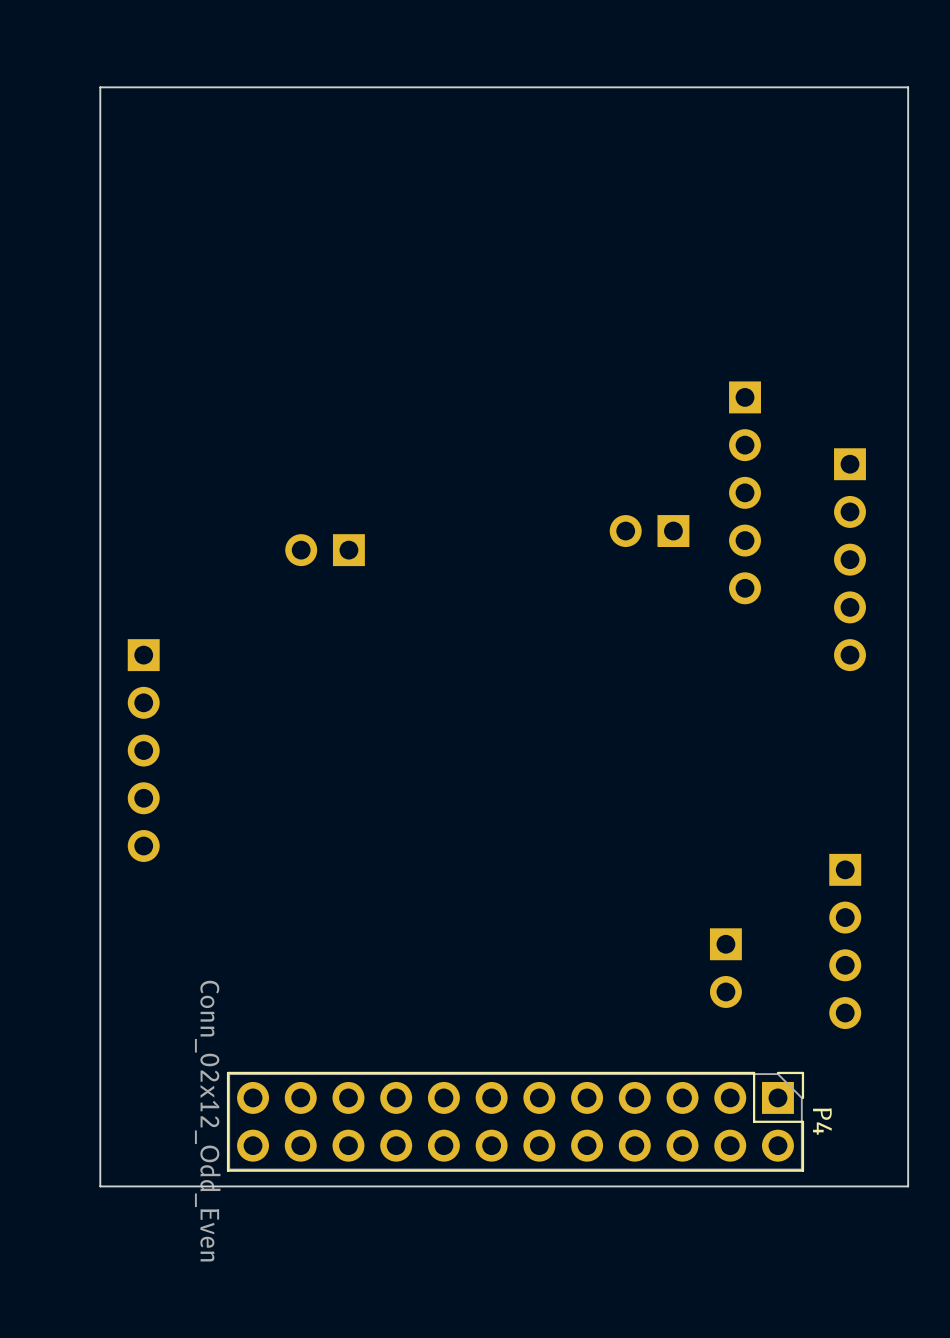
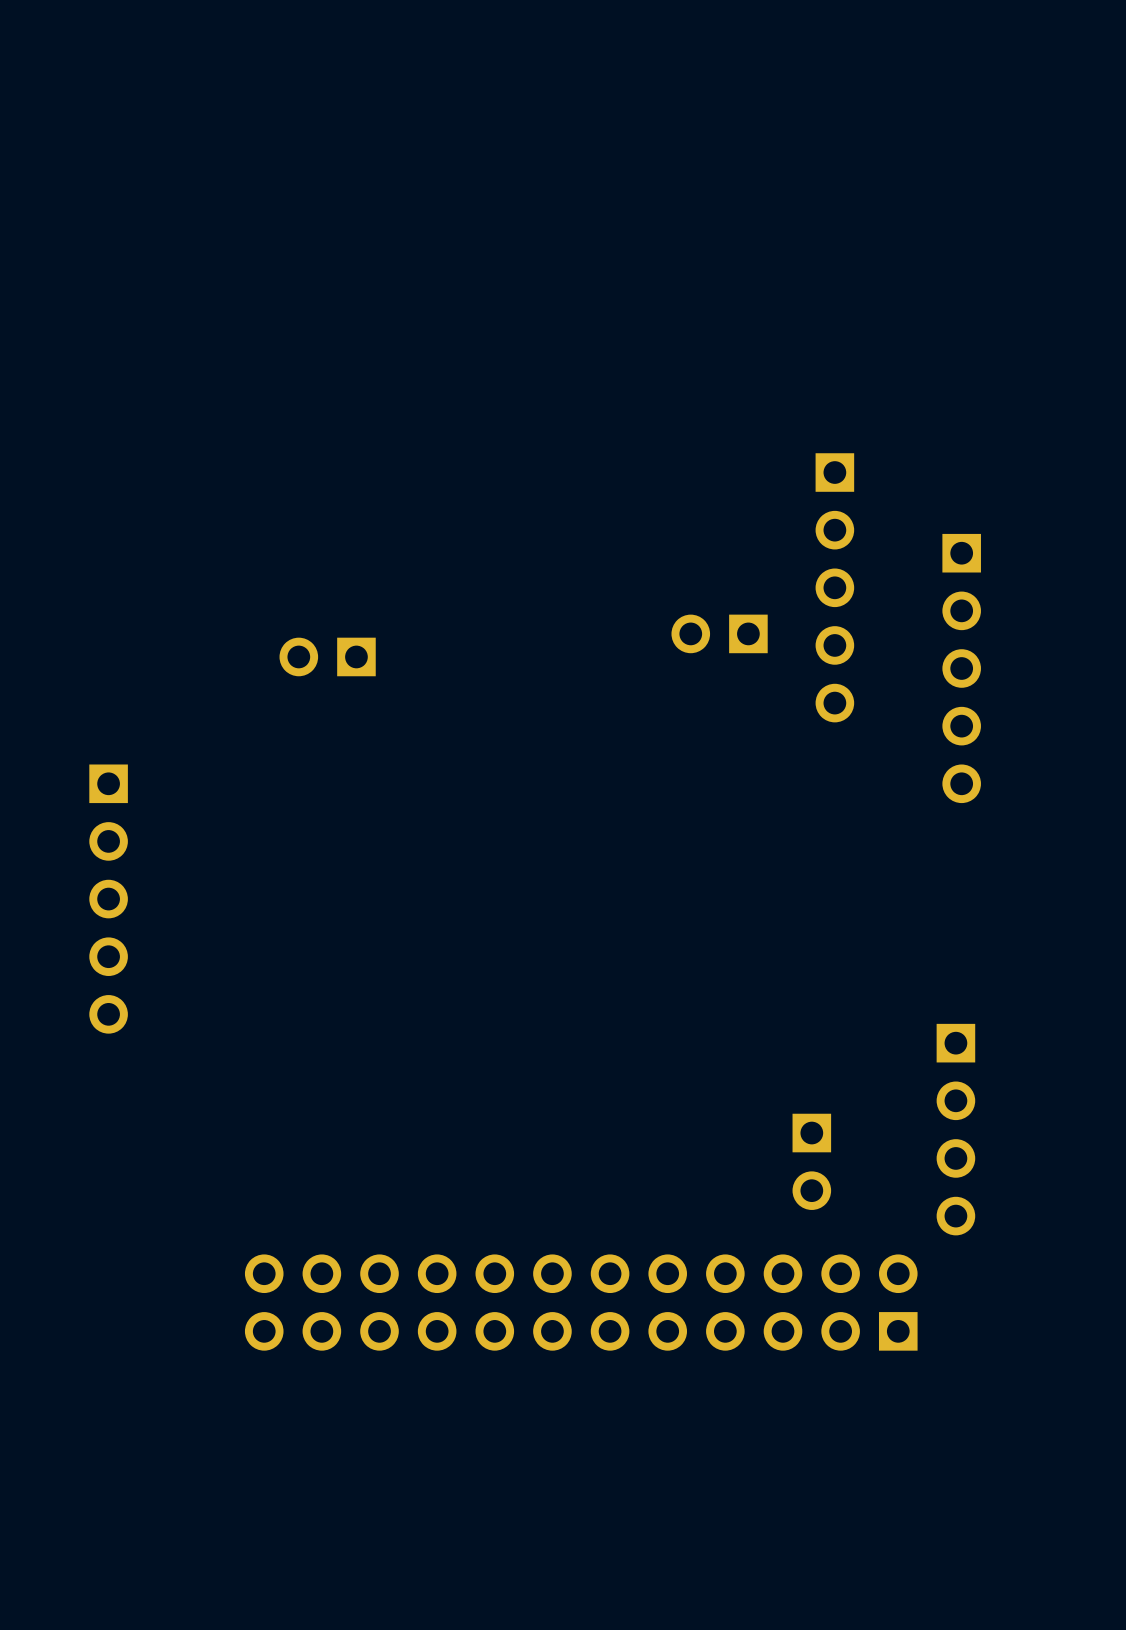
board edge: (908, 87) (100, 87) (100, 1186) (908, 1186) (908, 87) -> none
P4 side: bottom (515, 1121) -> top (581, 1302)

